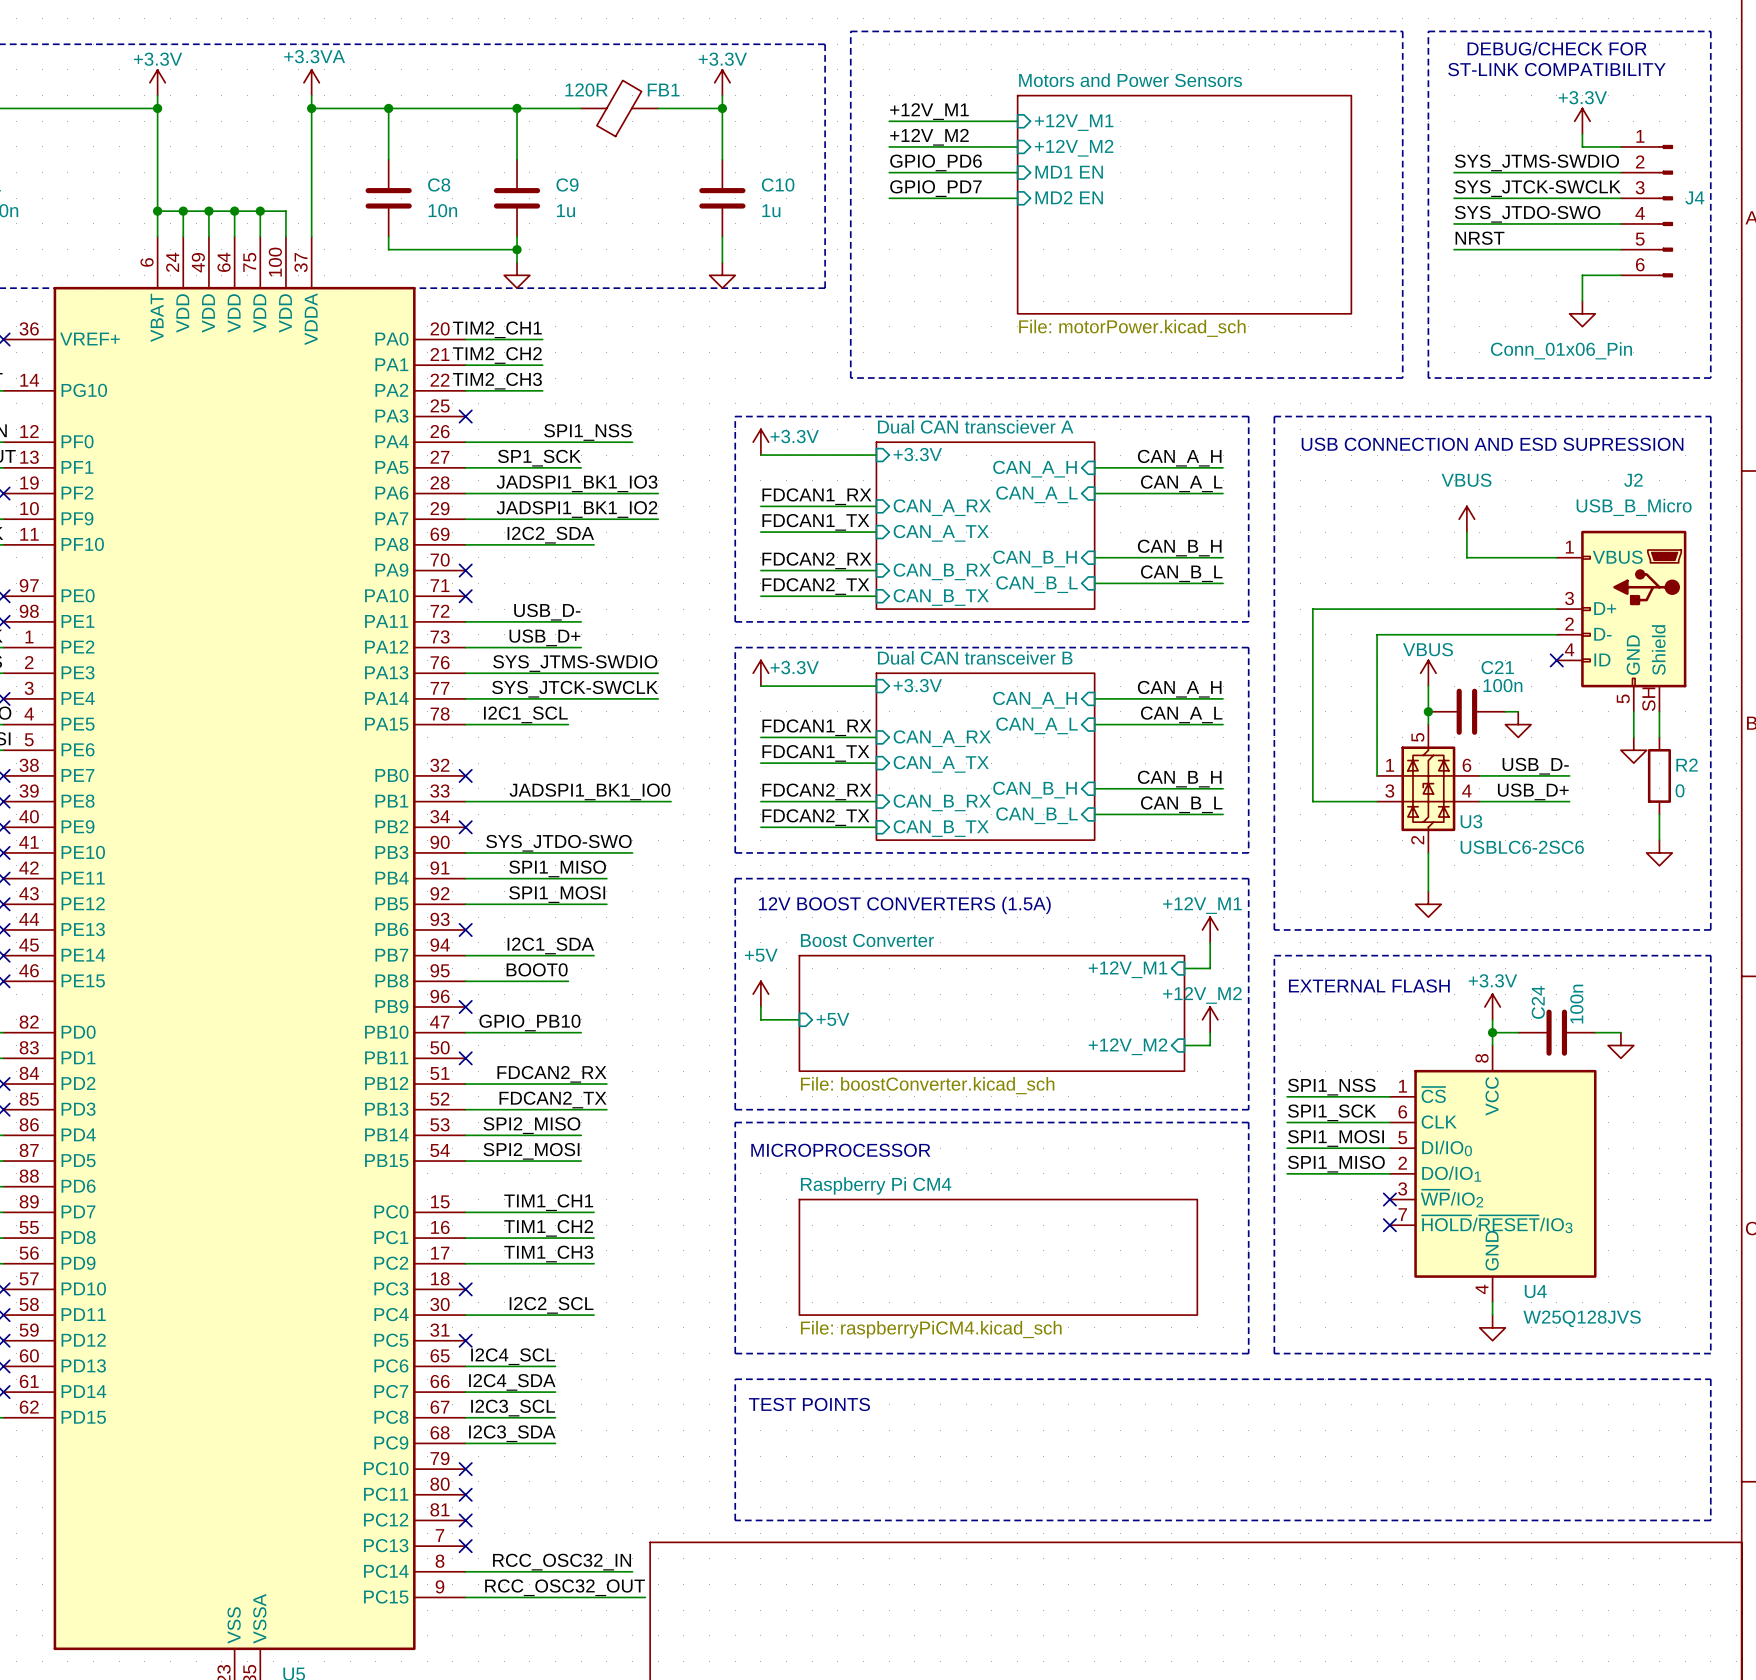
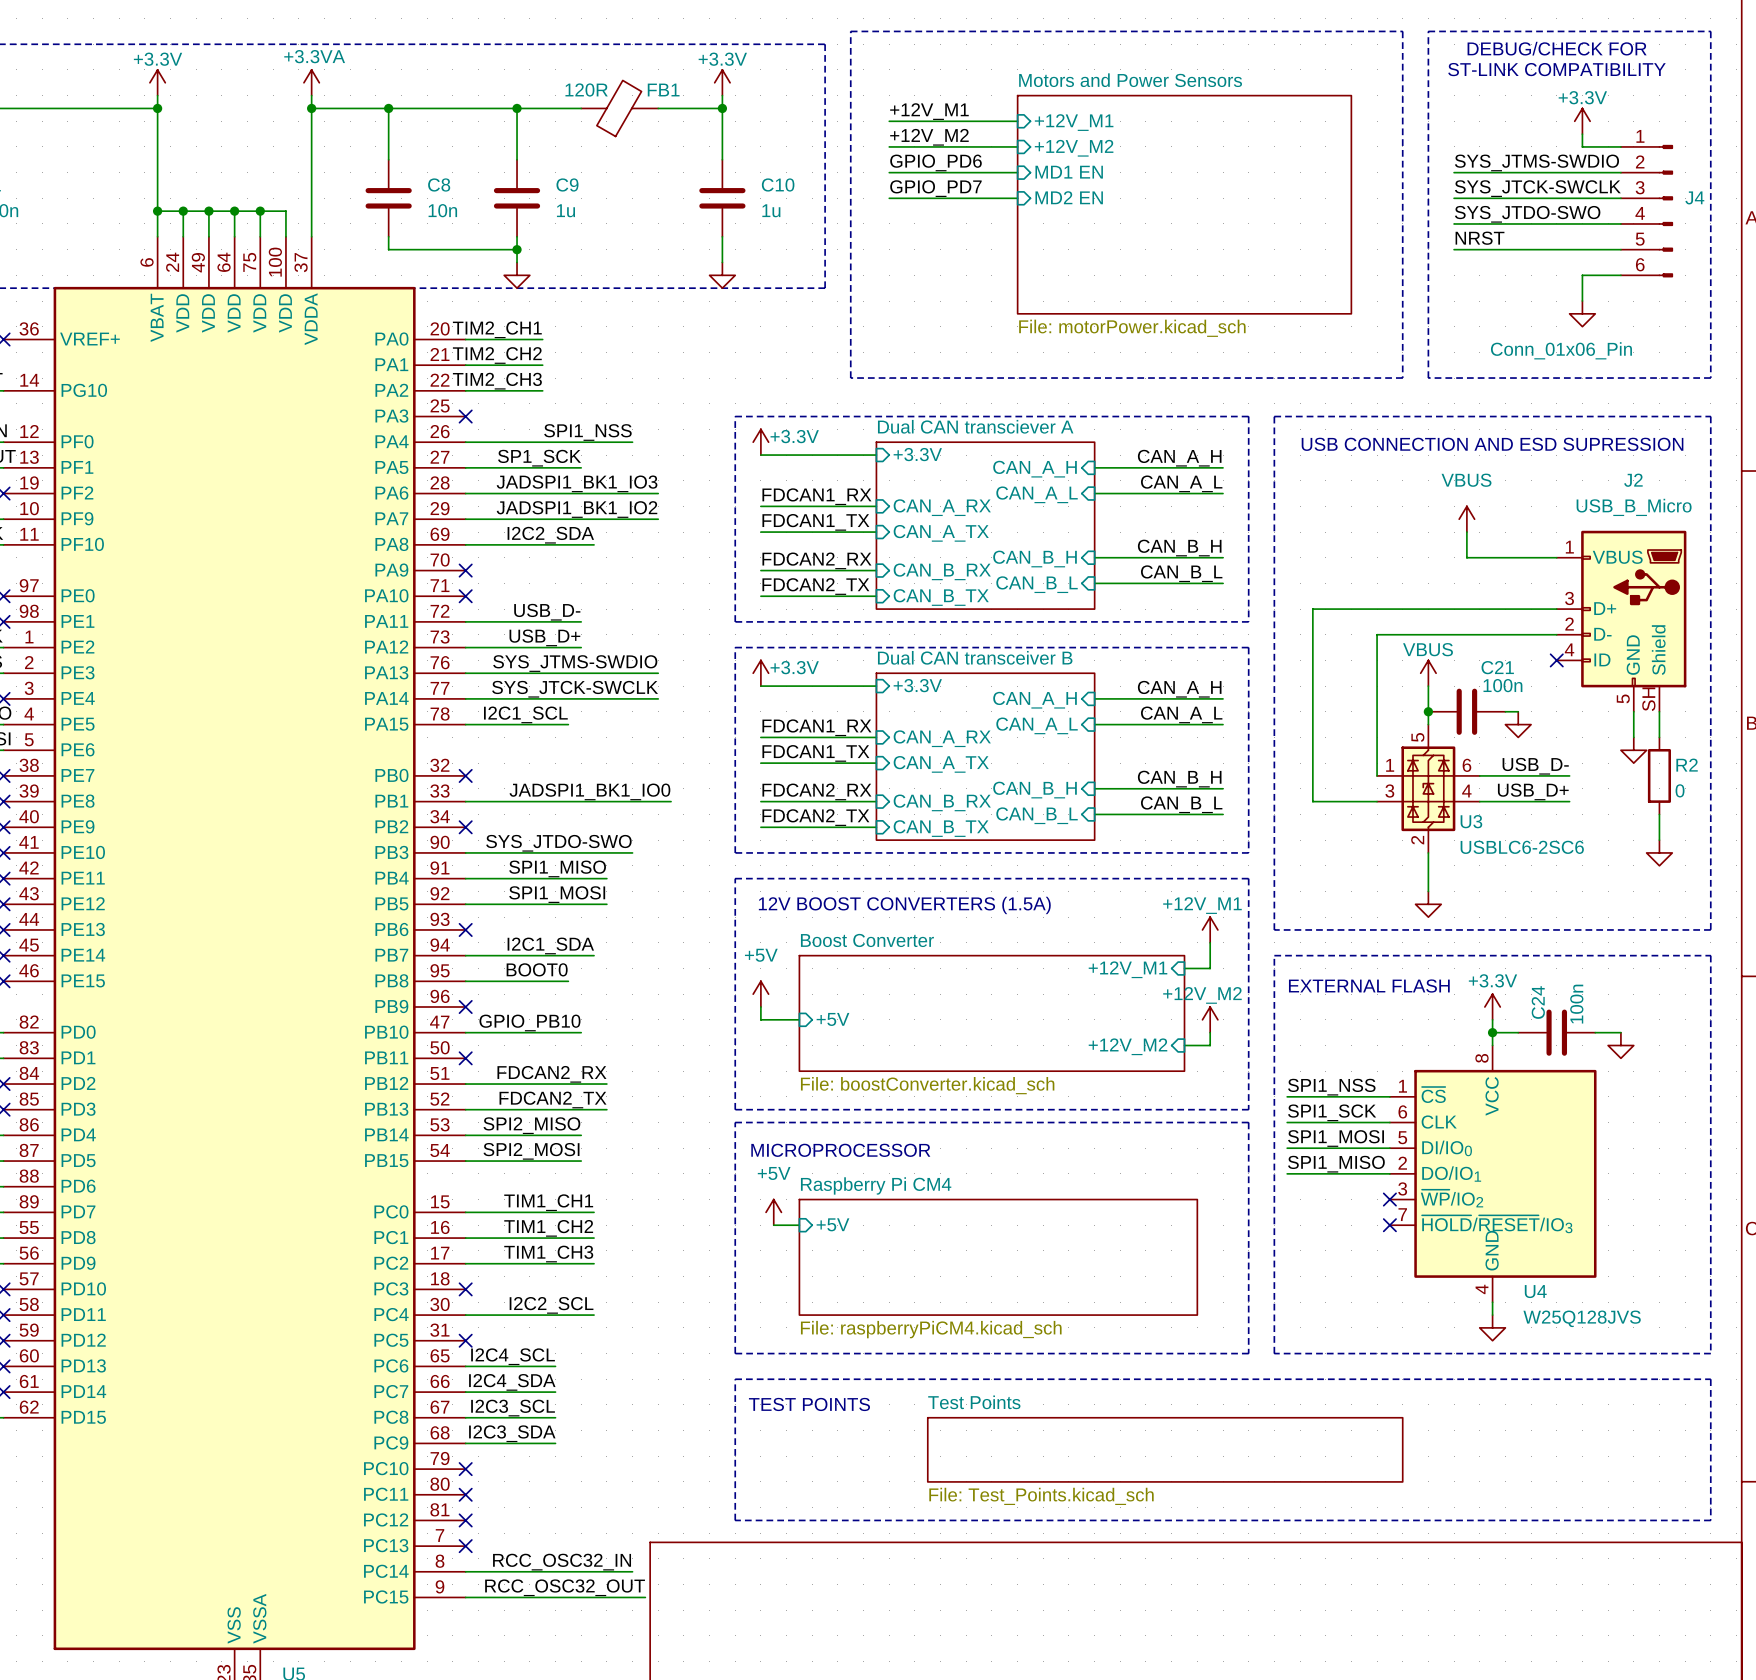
power symbol: none -> +5V (773, 1212)
sheet pin: none -> +5V (832, 1224)
wire: none -> (773, 1225) (799, 1225)
sheet Test Points: none -> File: Test_Points.kicad_sch (1165, 1449)

